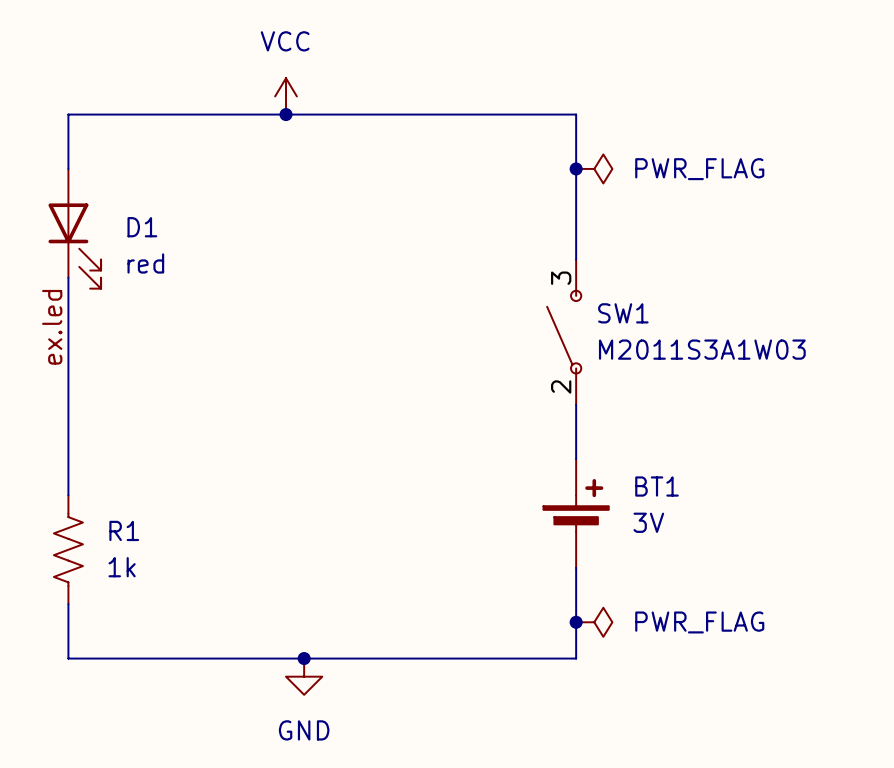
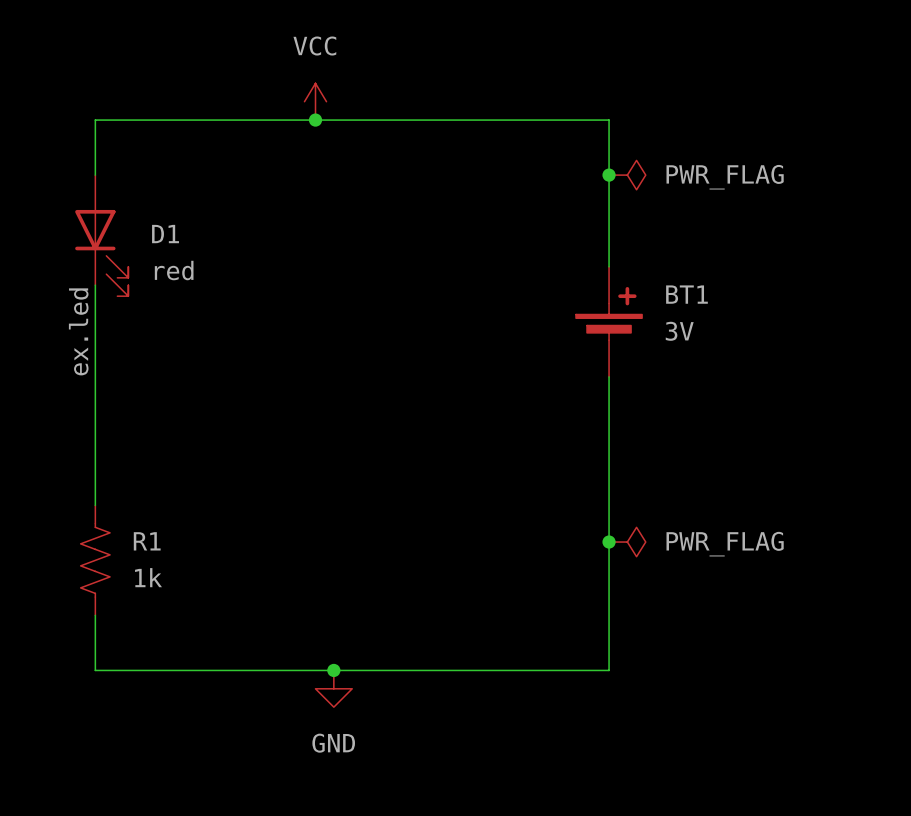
SW1: M2011S3A1W03 (564, 332) -> none
BT1 position: (576, 513) -> (609, 321)
junction: none -> (609, 542)
junction: (576, 622) -> none
power symbol position: PWR_FLAG (594, 622) -> PWR_FLAG (627, 542)

